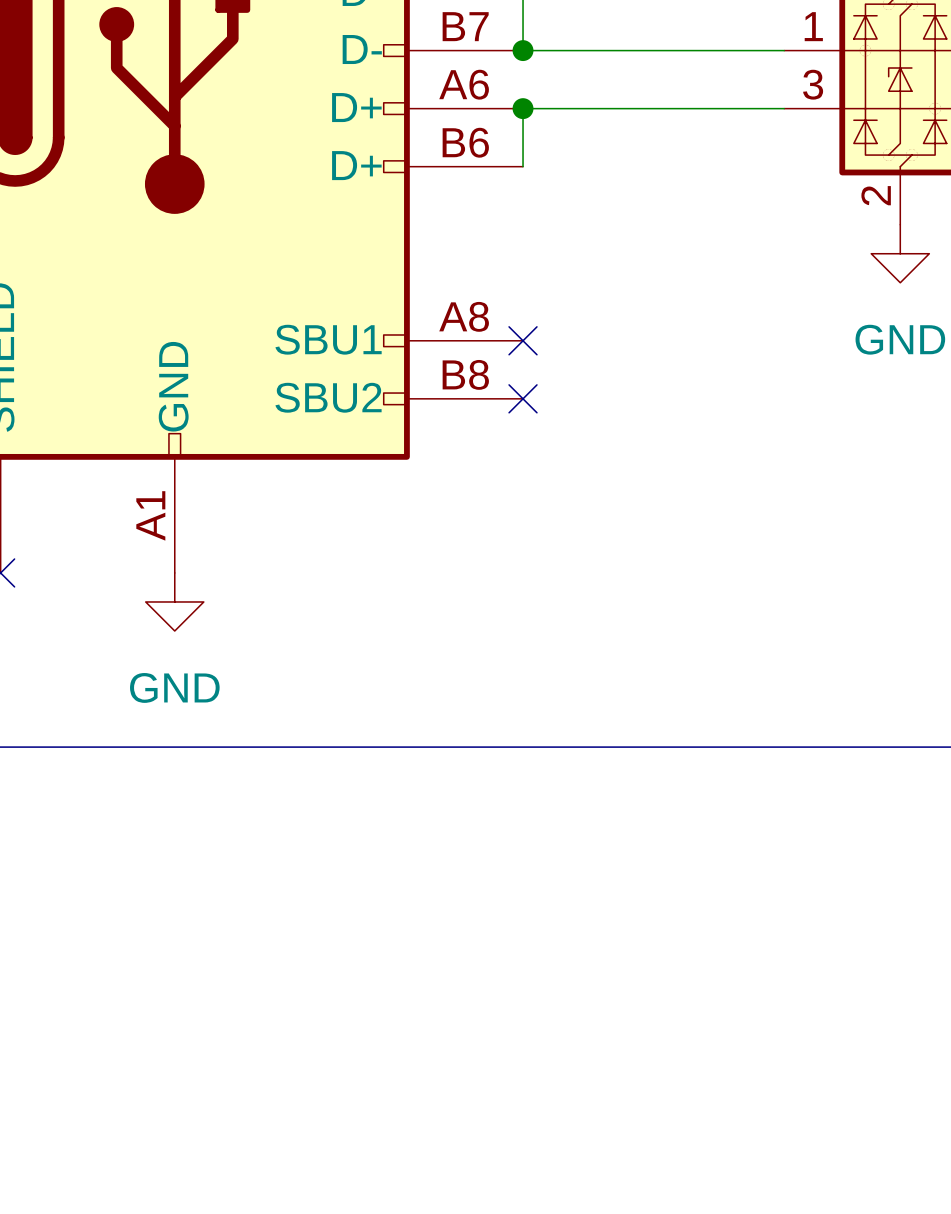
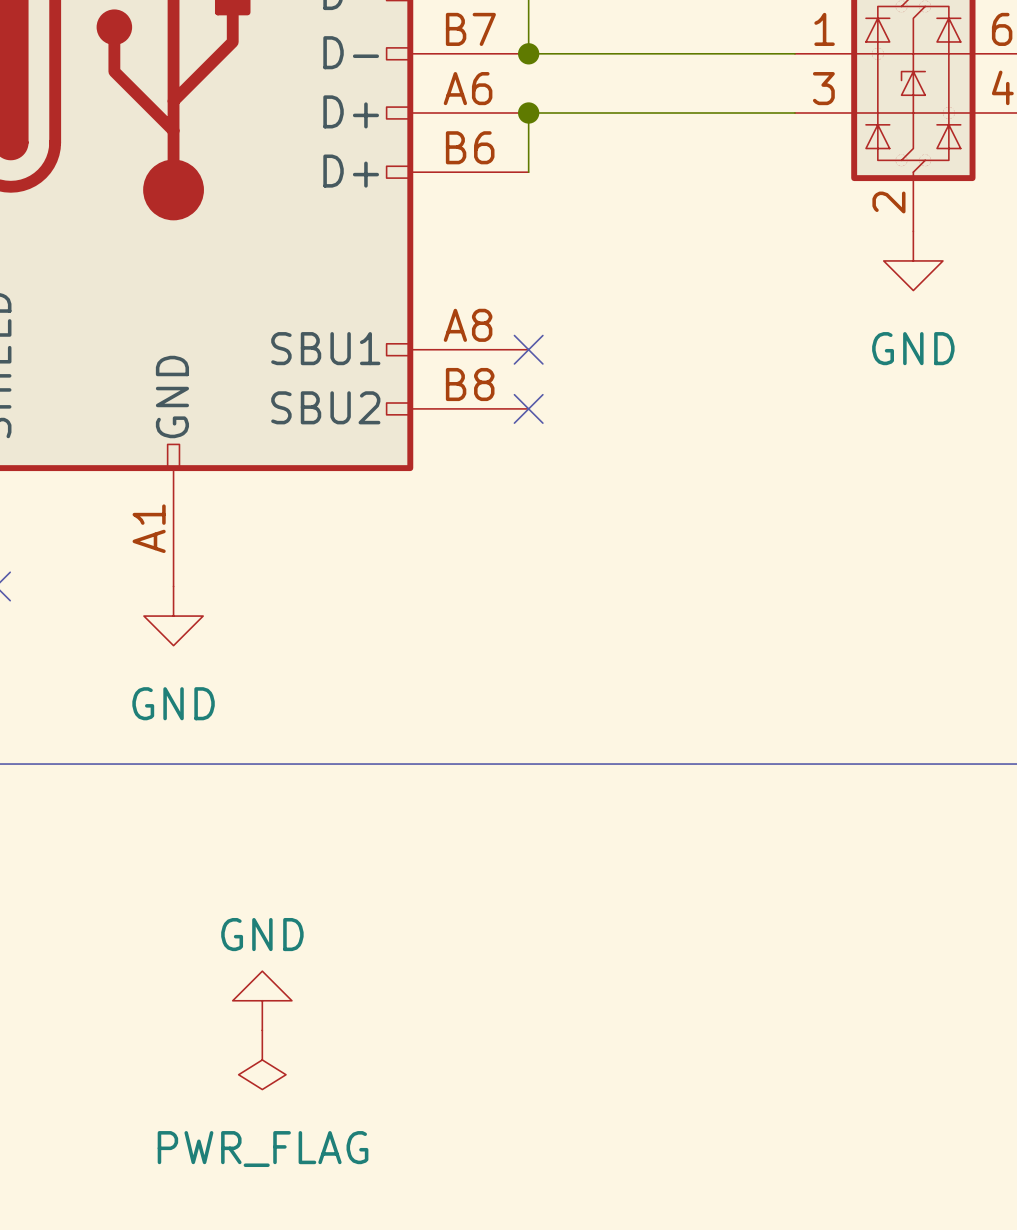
power symbol: none -> GND (262, 1000)
power symbol: none -> PWR_FLAG (262, 1059)

